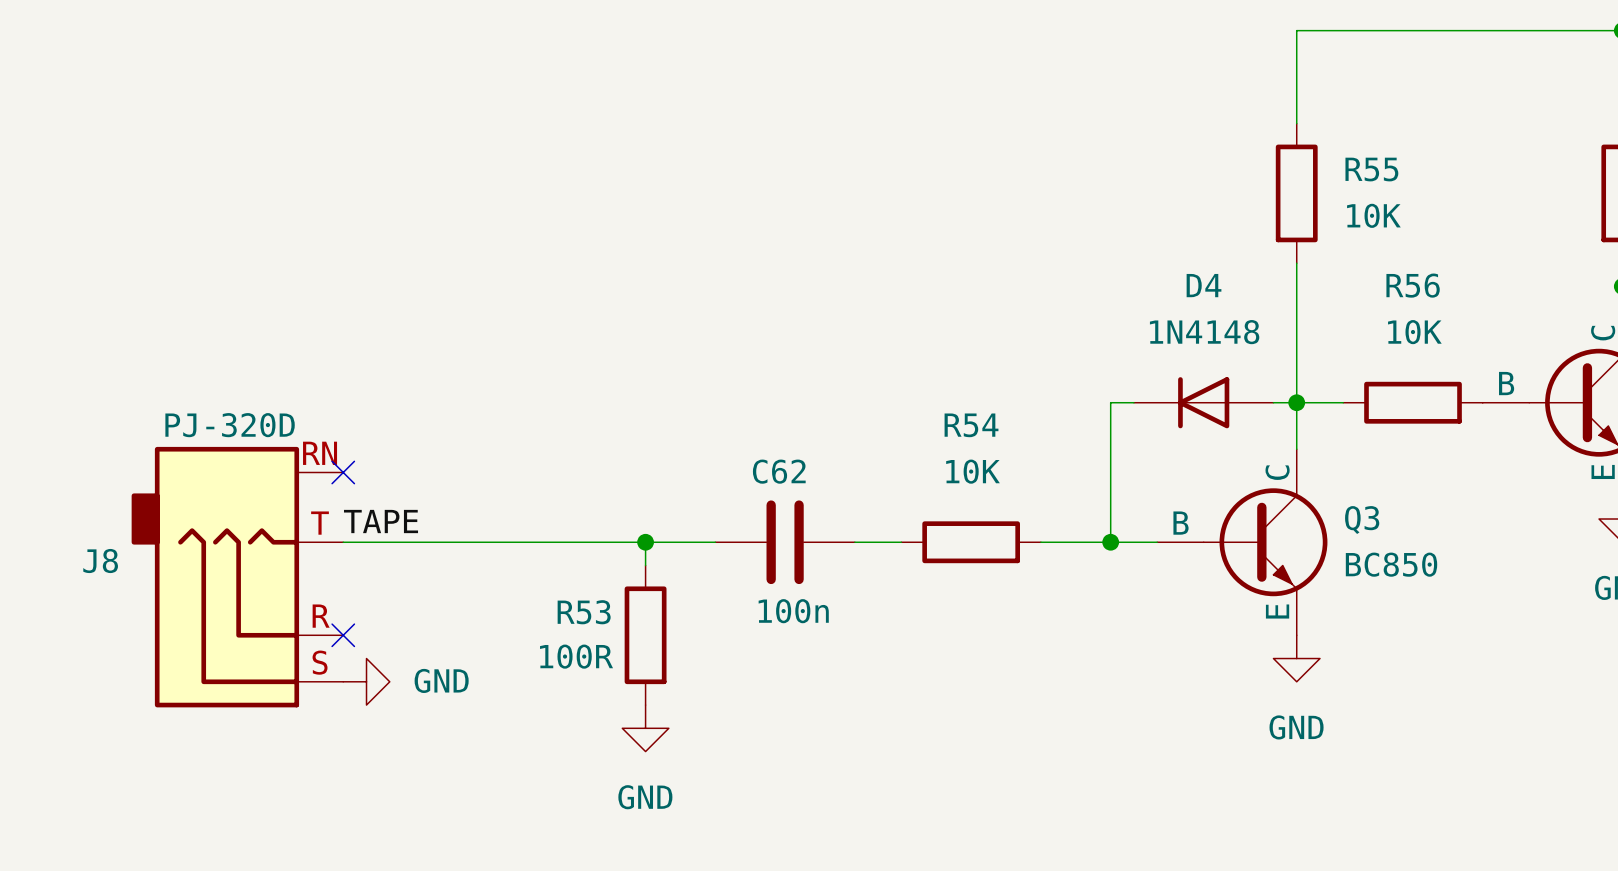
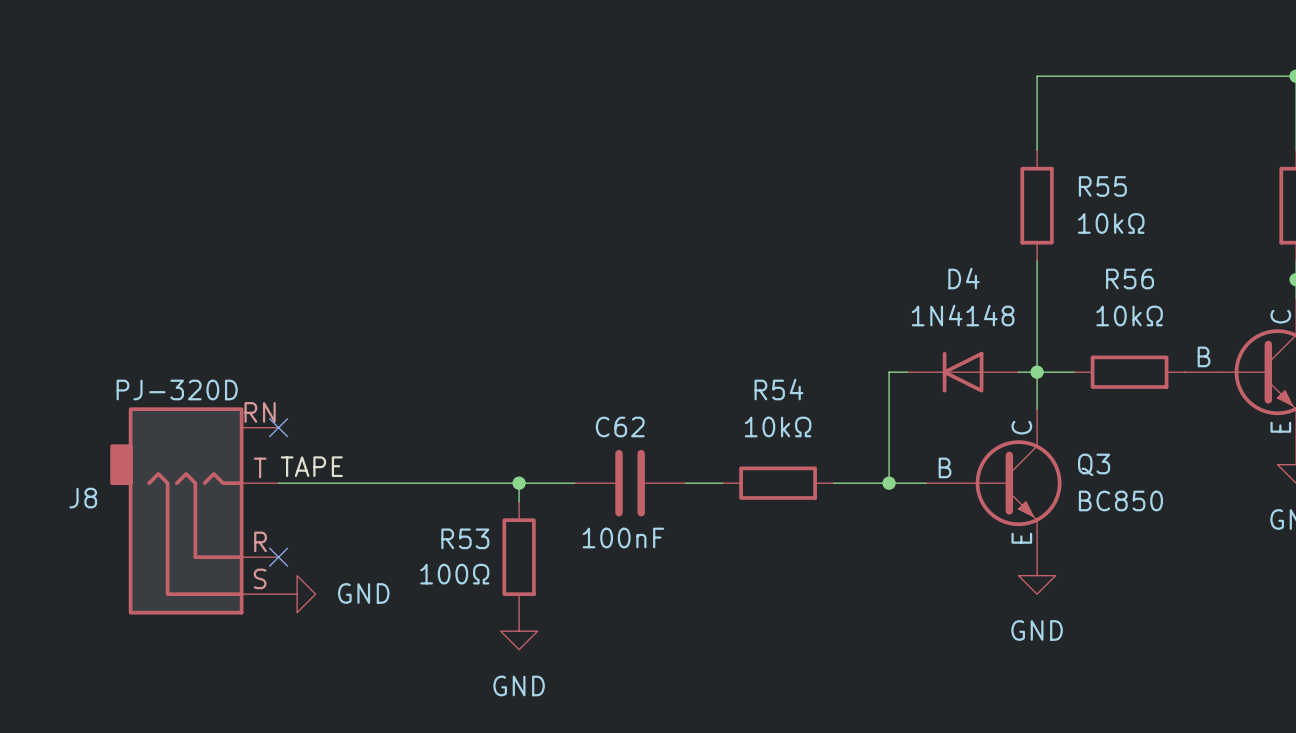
R55 value: 10K (1373, 215) -> 10kΩ (1111, 223)
R56 value: 10K (1414, 332) -> 10kΩ (1129, 315)
R54 value: 10K (973, 471) -> 10kΩ (778, 426)
C62 value: 100n (793, 611) -> 100nF (623, 537)
R53 value: 100R (576, 656) -> 100Ω (454, 574)

